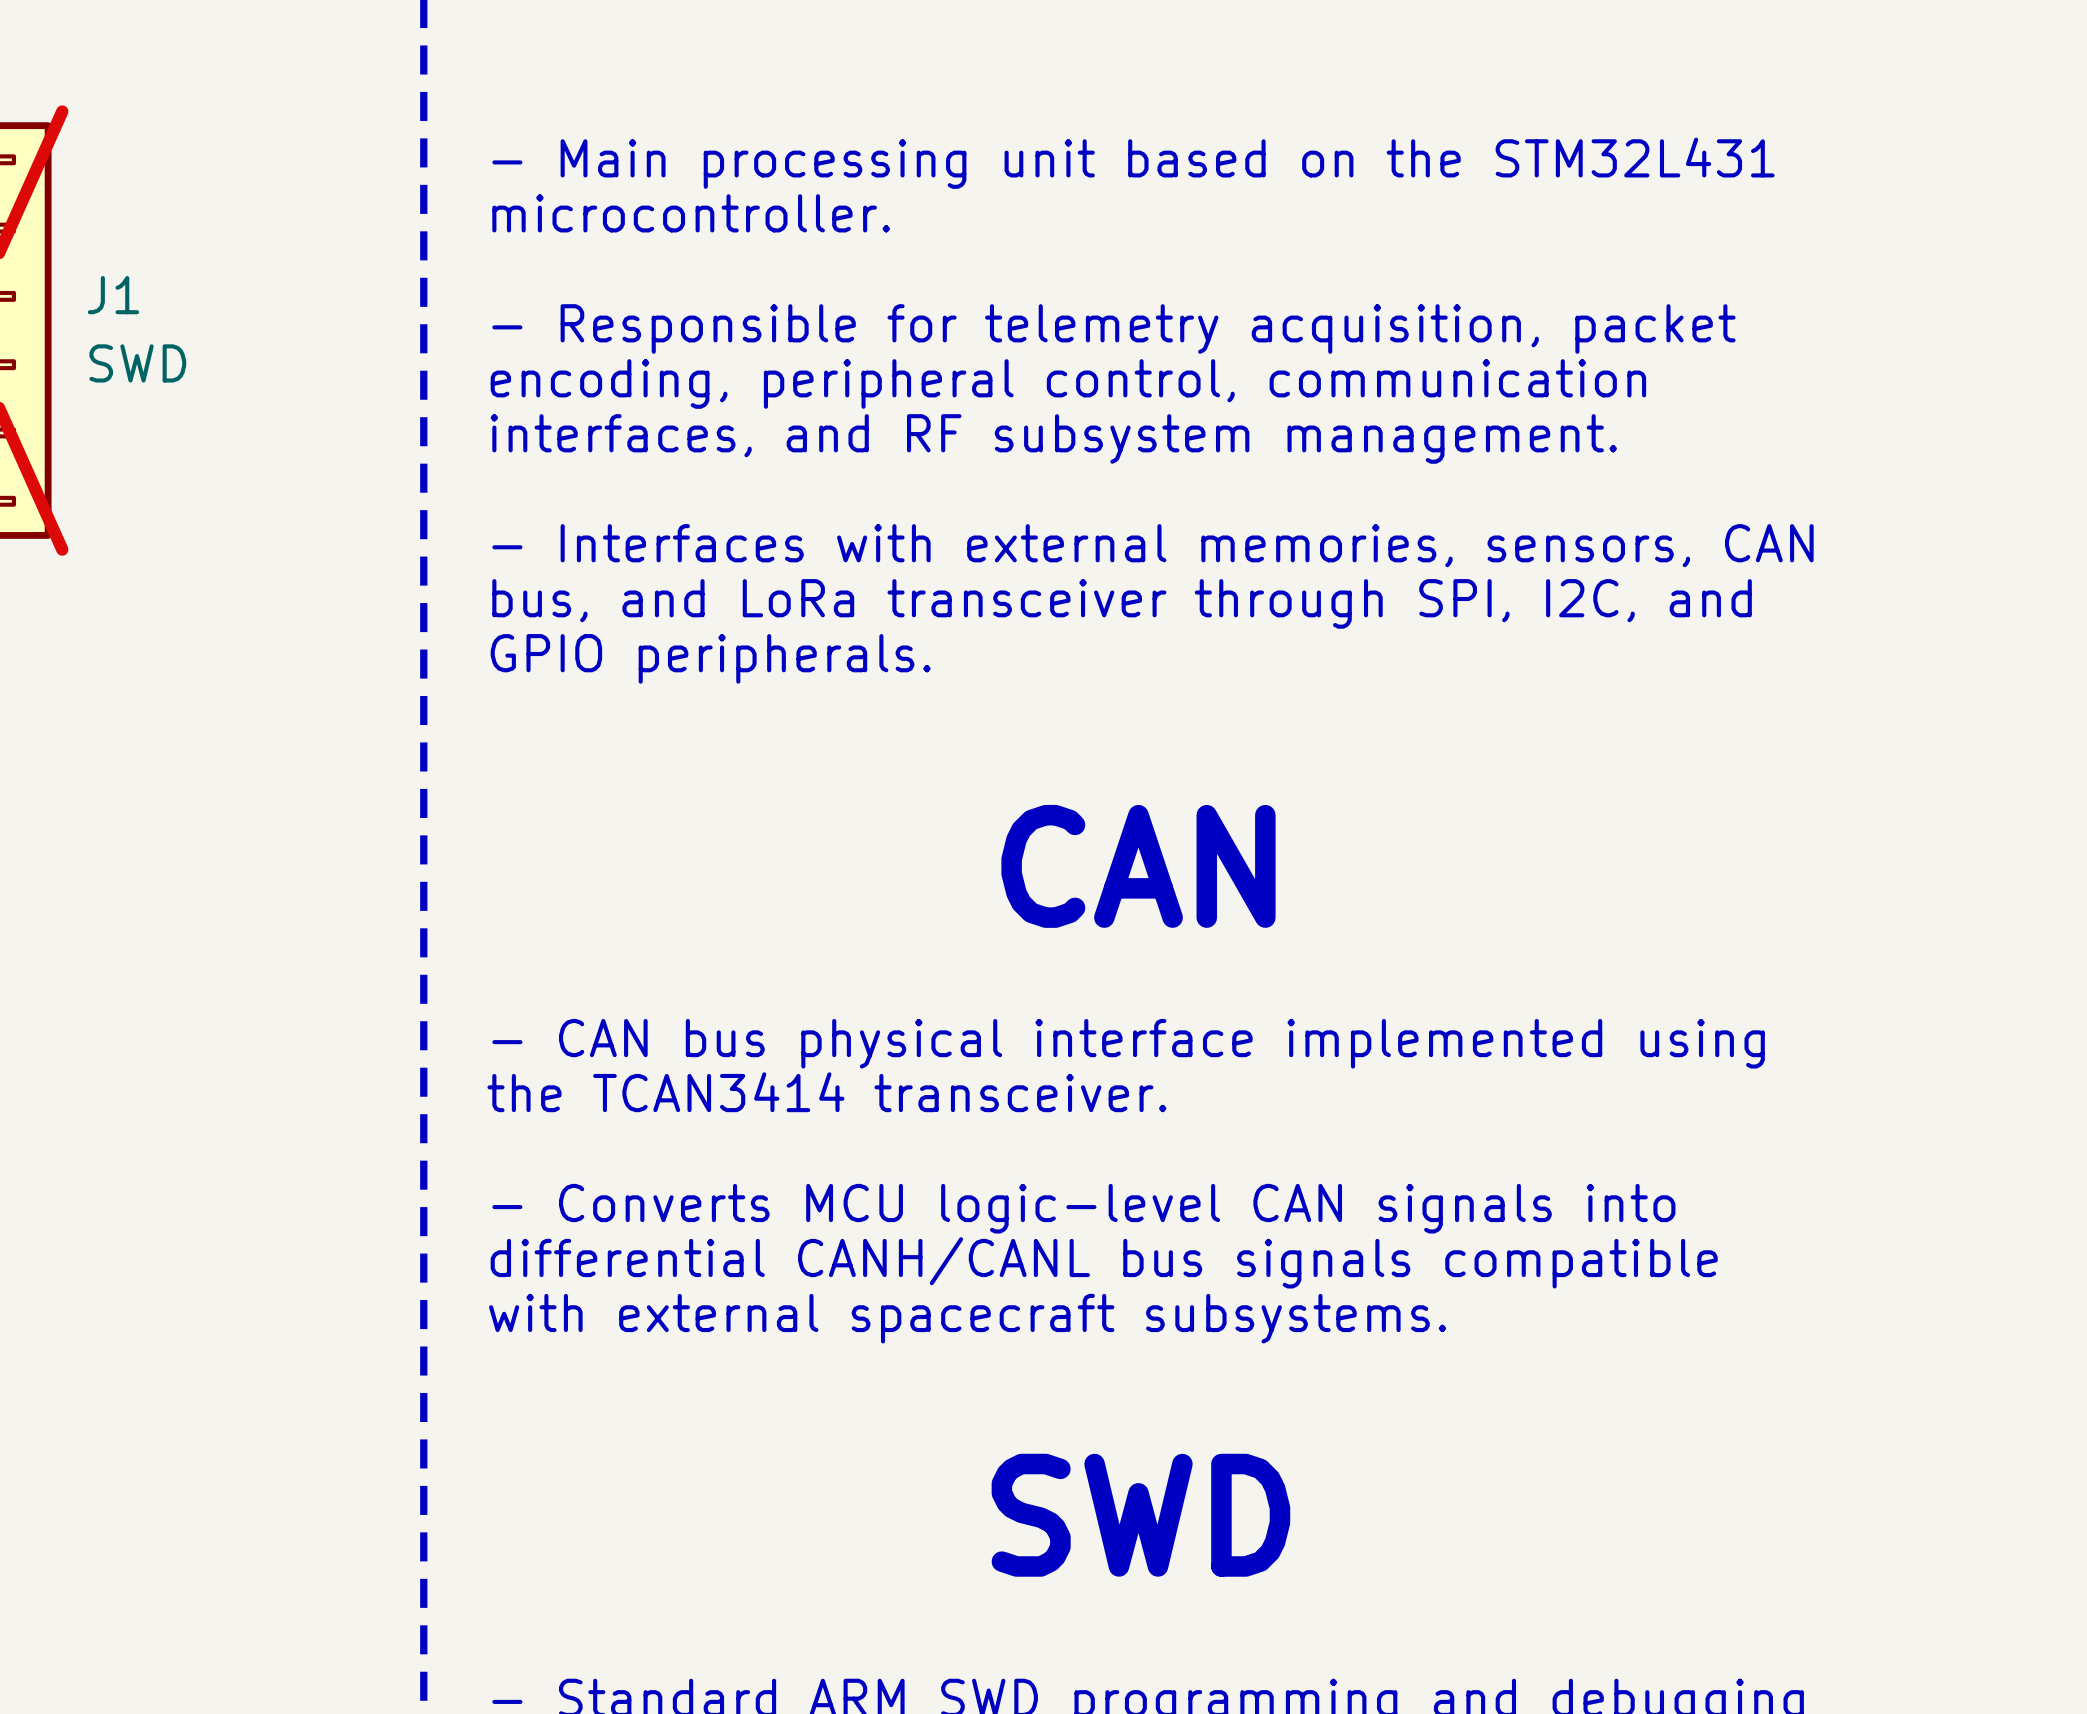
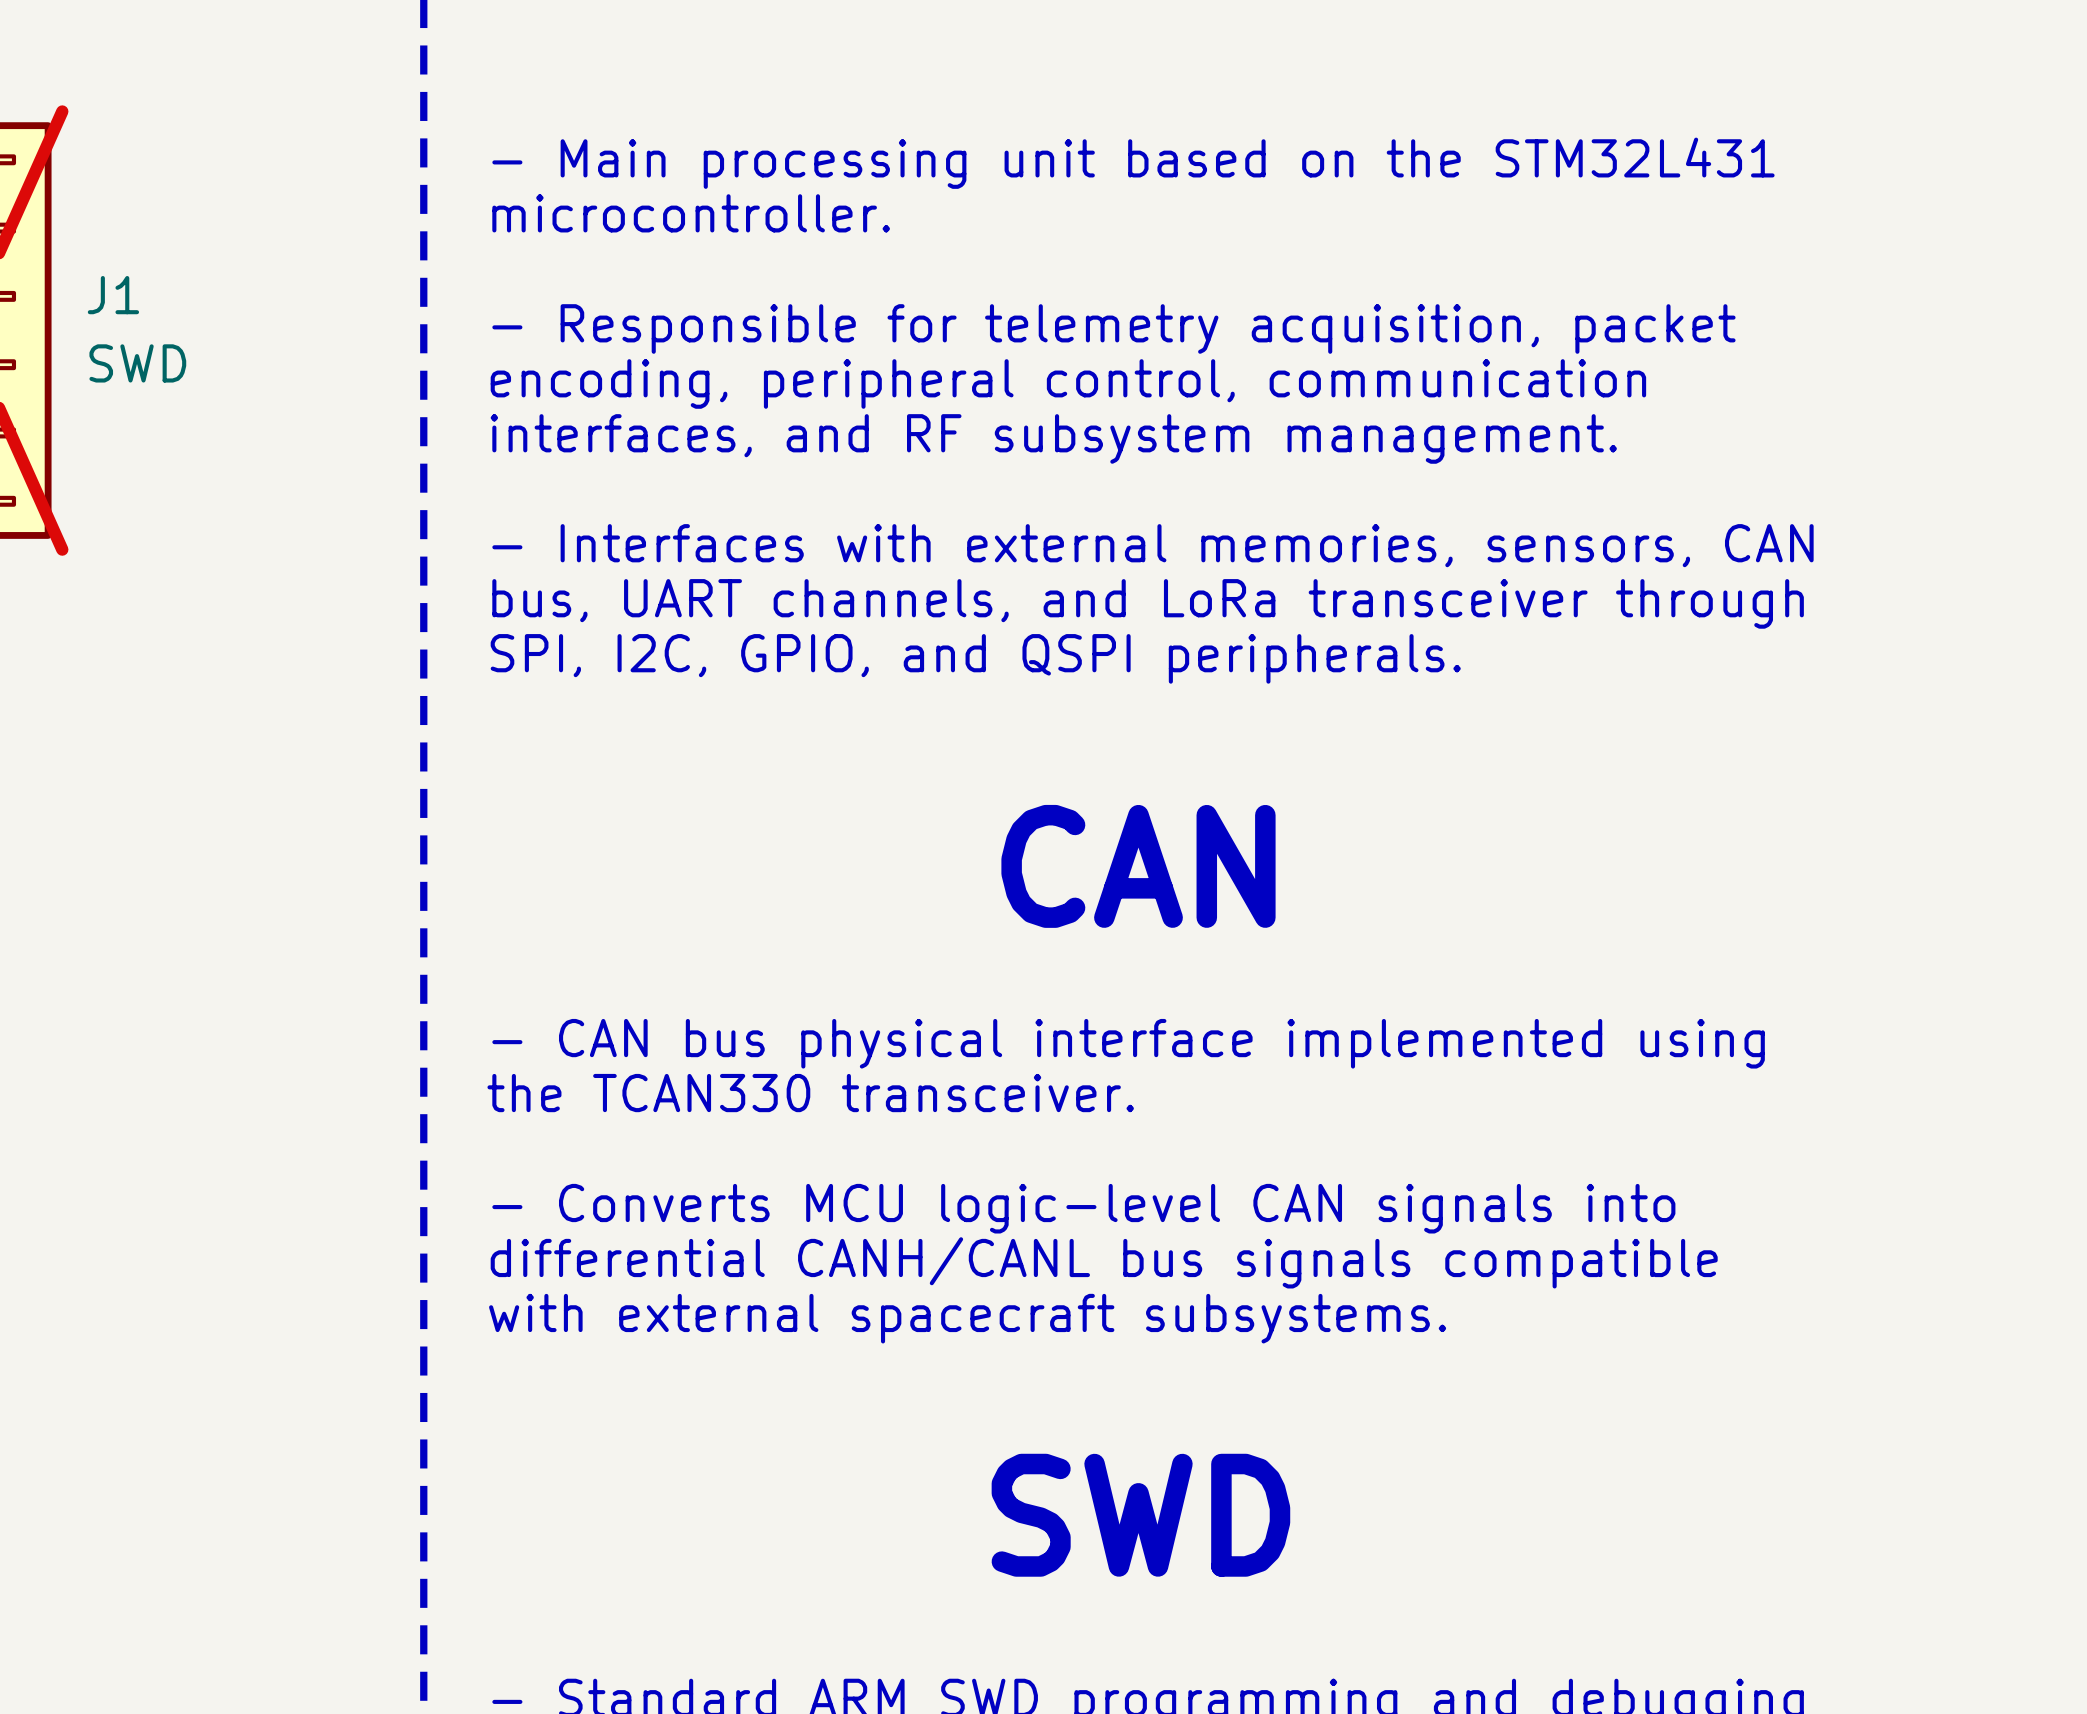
text: bus, and LoRa transceiver through SPI, I2C, and (1122, 603) -> bus, UART channels, and LoRa transceiver through (1148, 603)
text: GPIO peripherals. (710, 658) -> SPI, I2C, GPIO, and QSPI peripherals. (975, 658)
text: the TCAN3414 transceiver. (826, 1092) -> the TCAN330 transceiver. (810, 1093)

